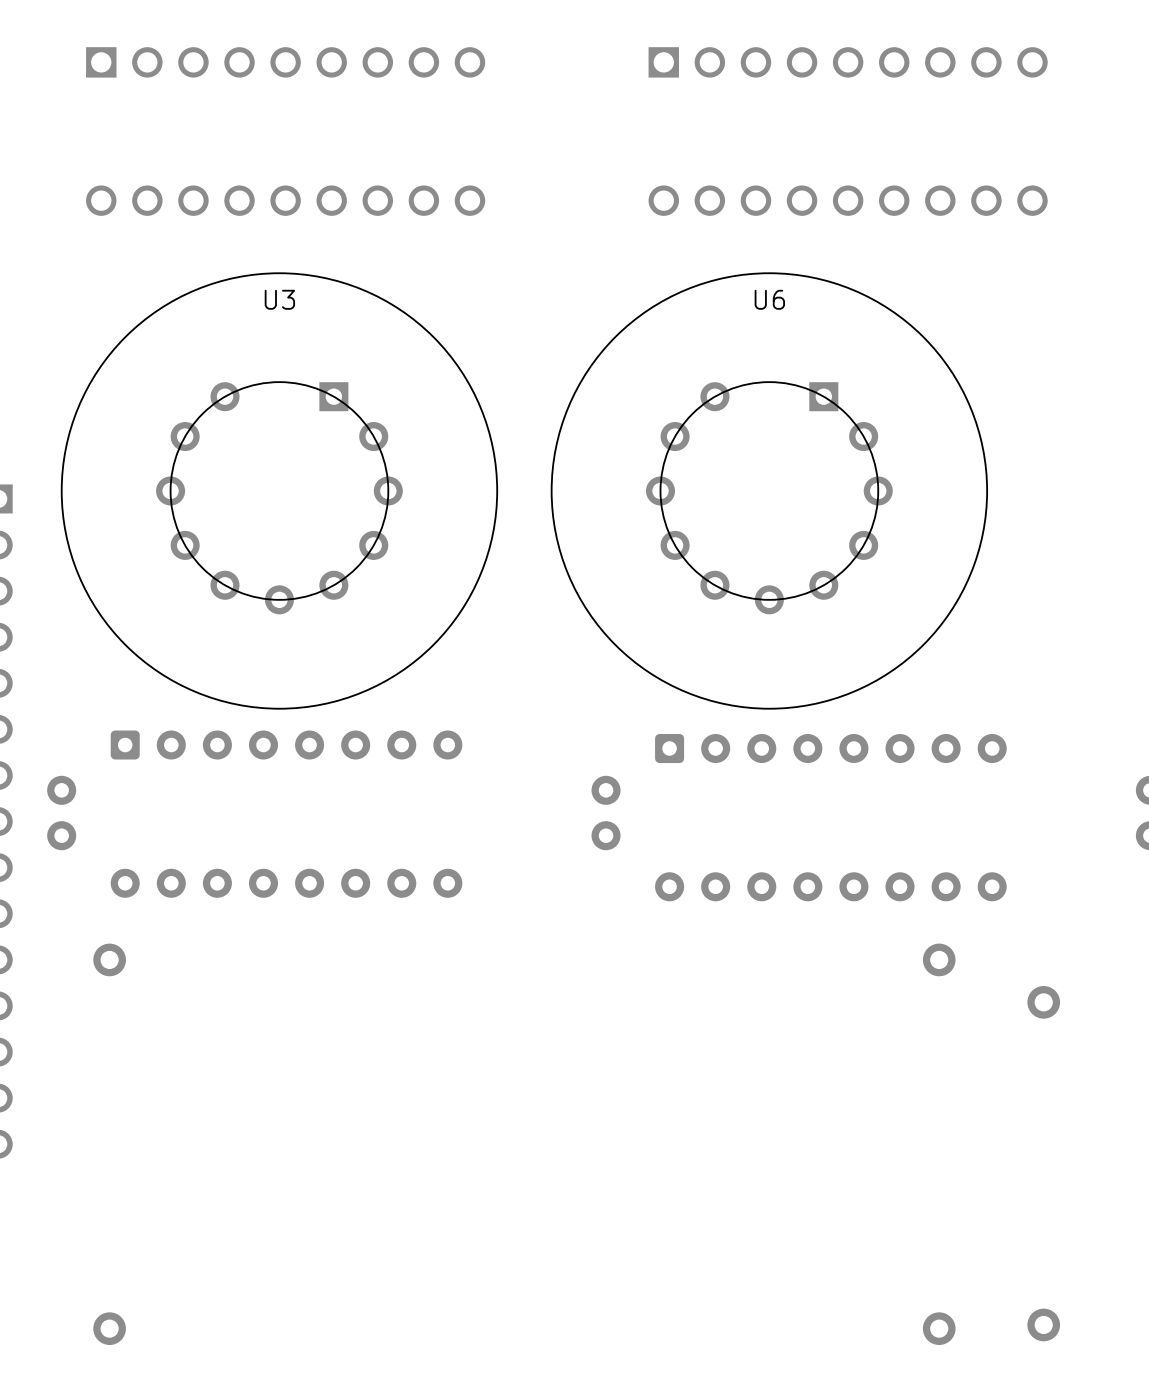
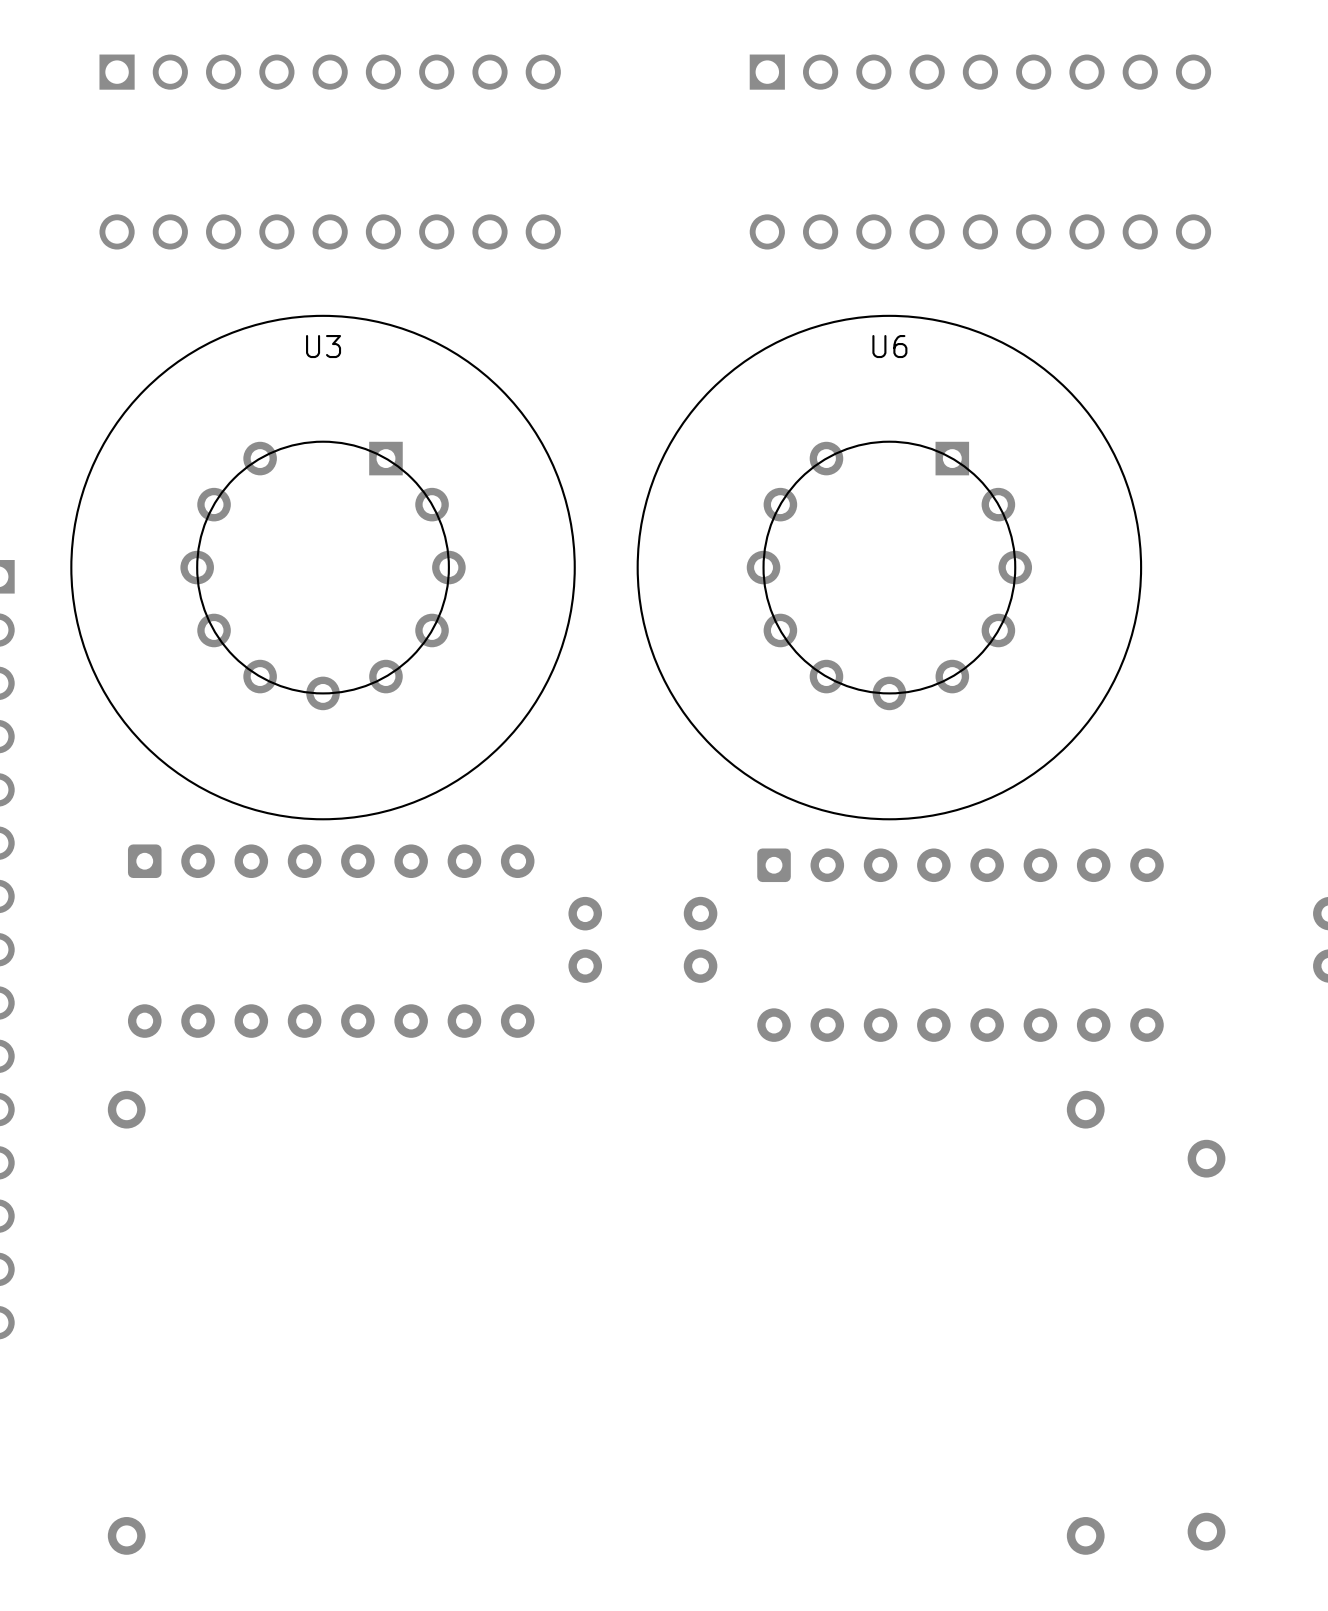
part position: (61, 813) -> (585, 939)

